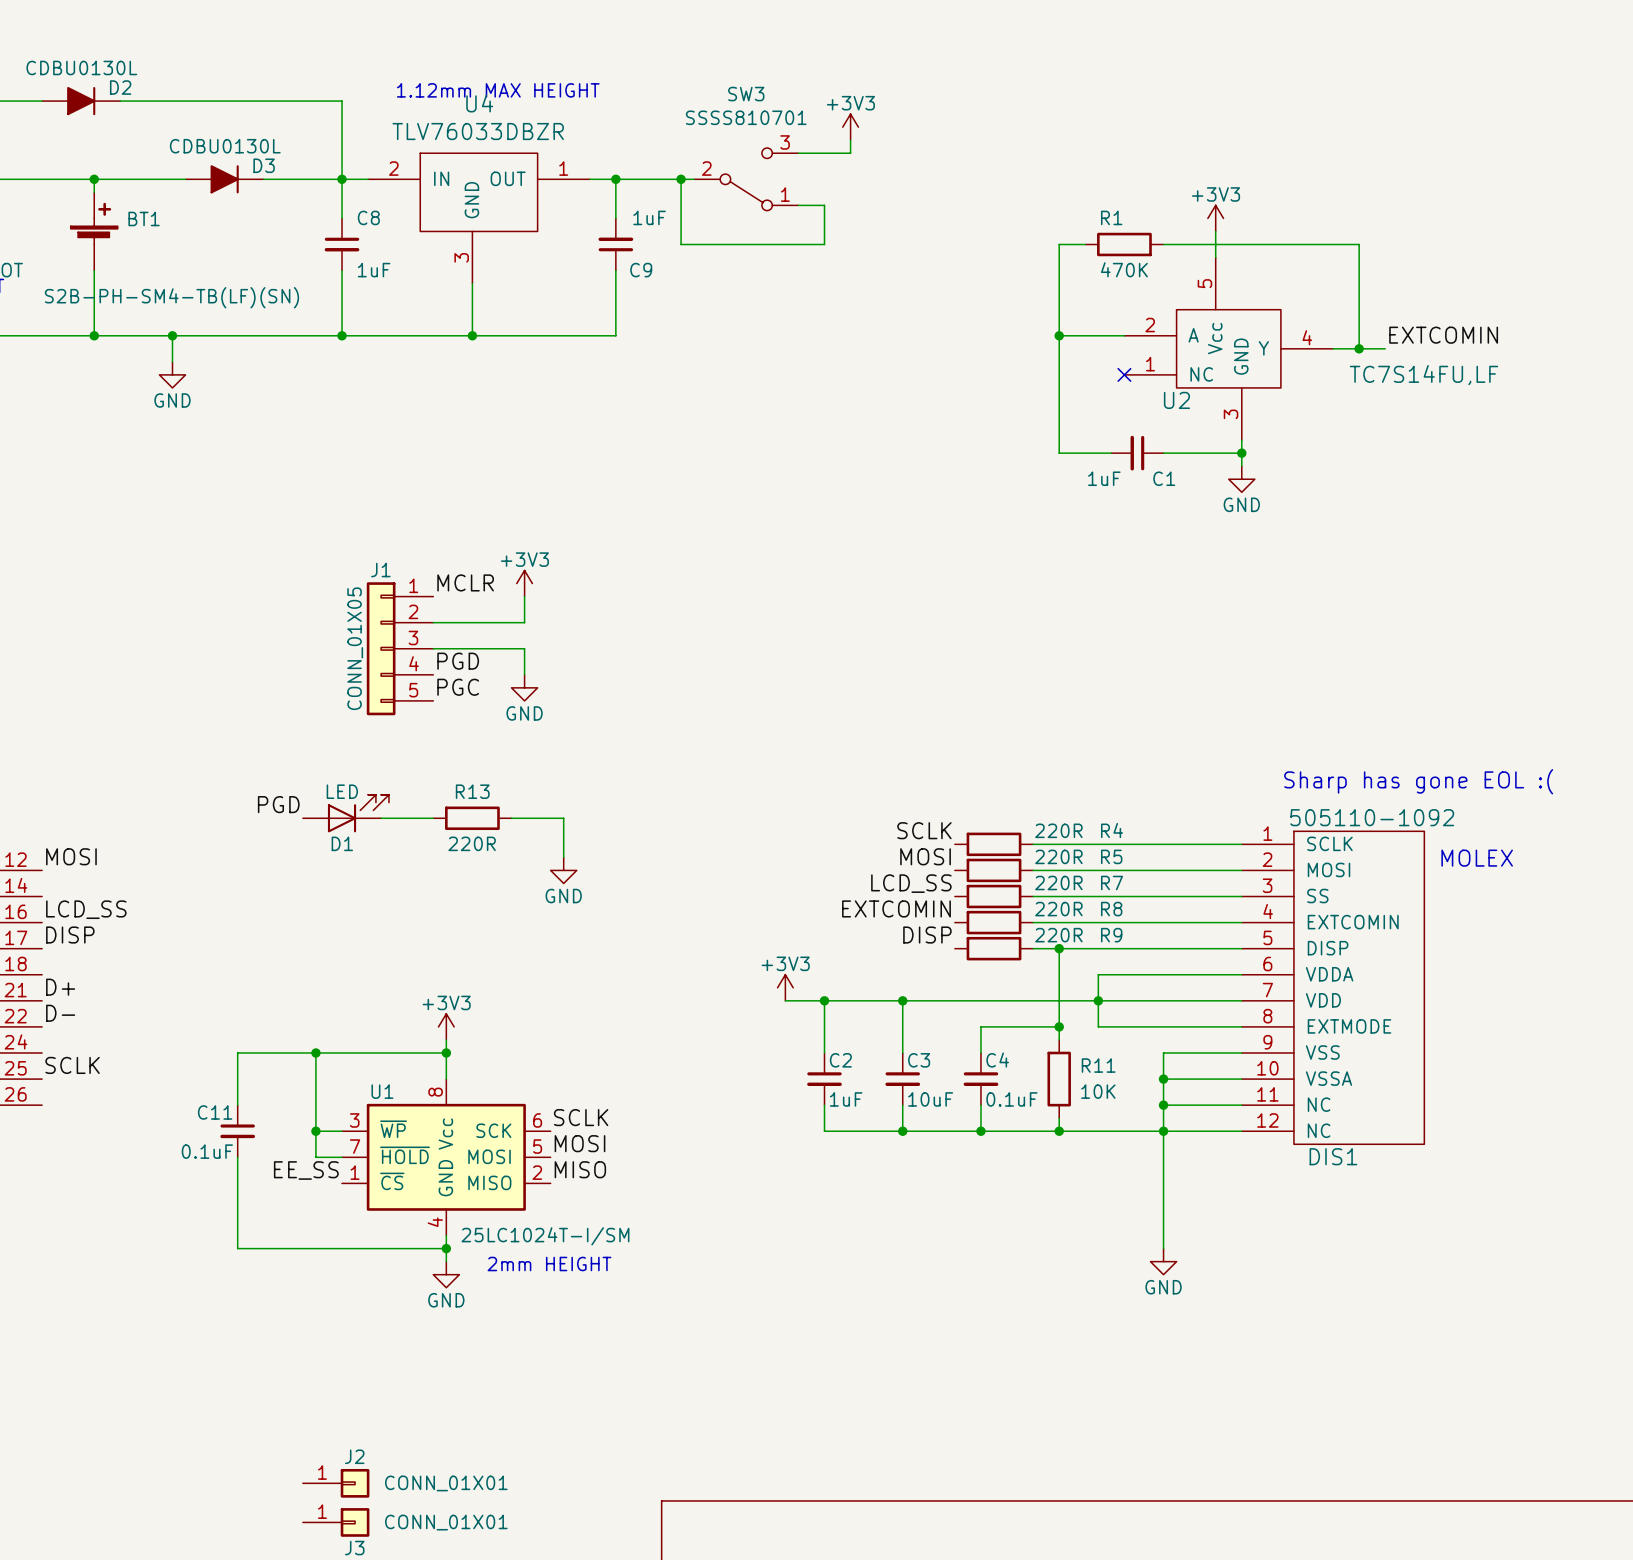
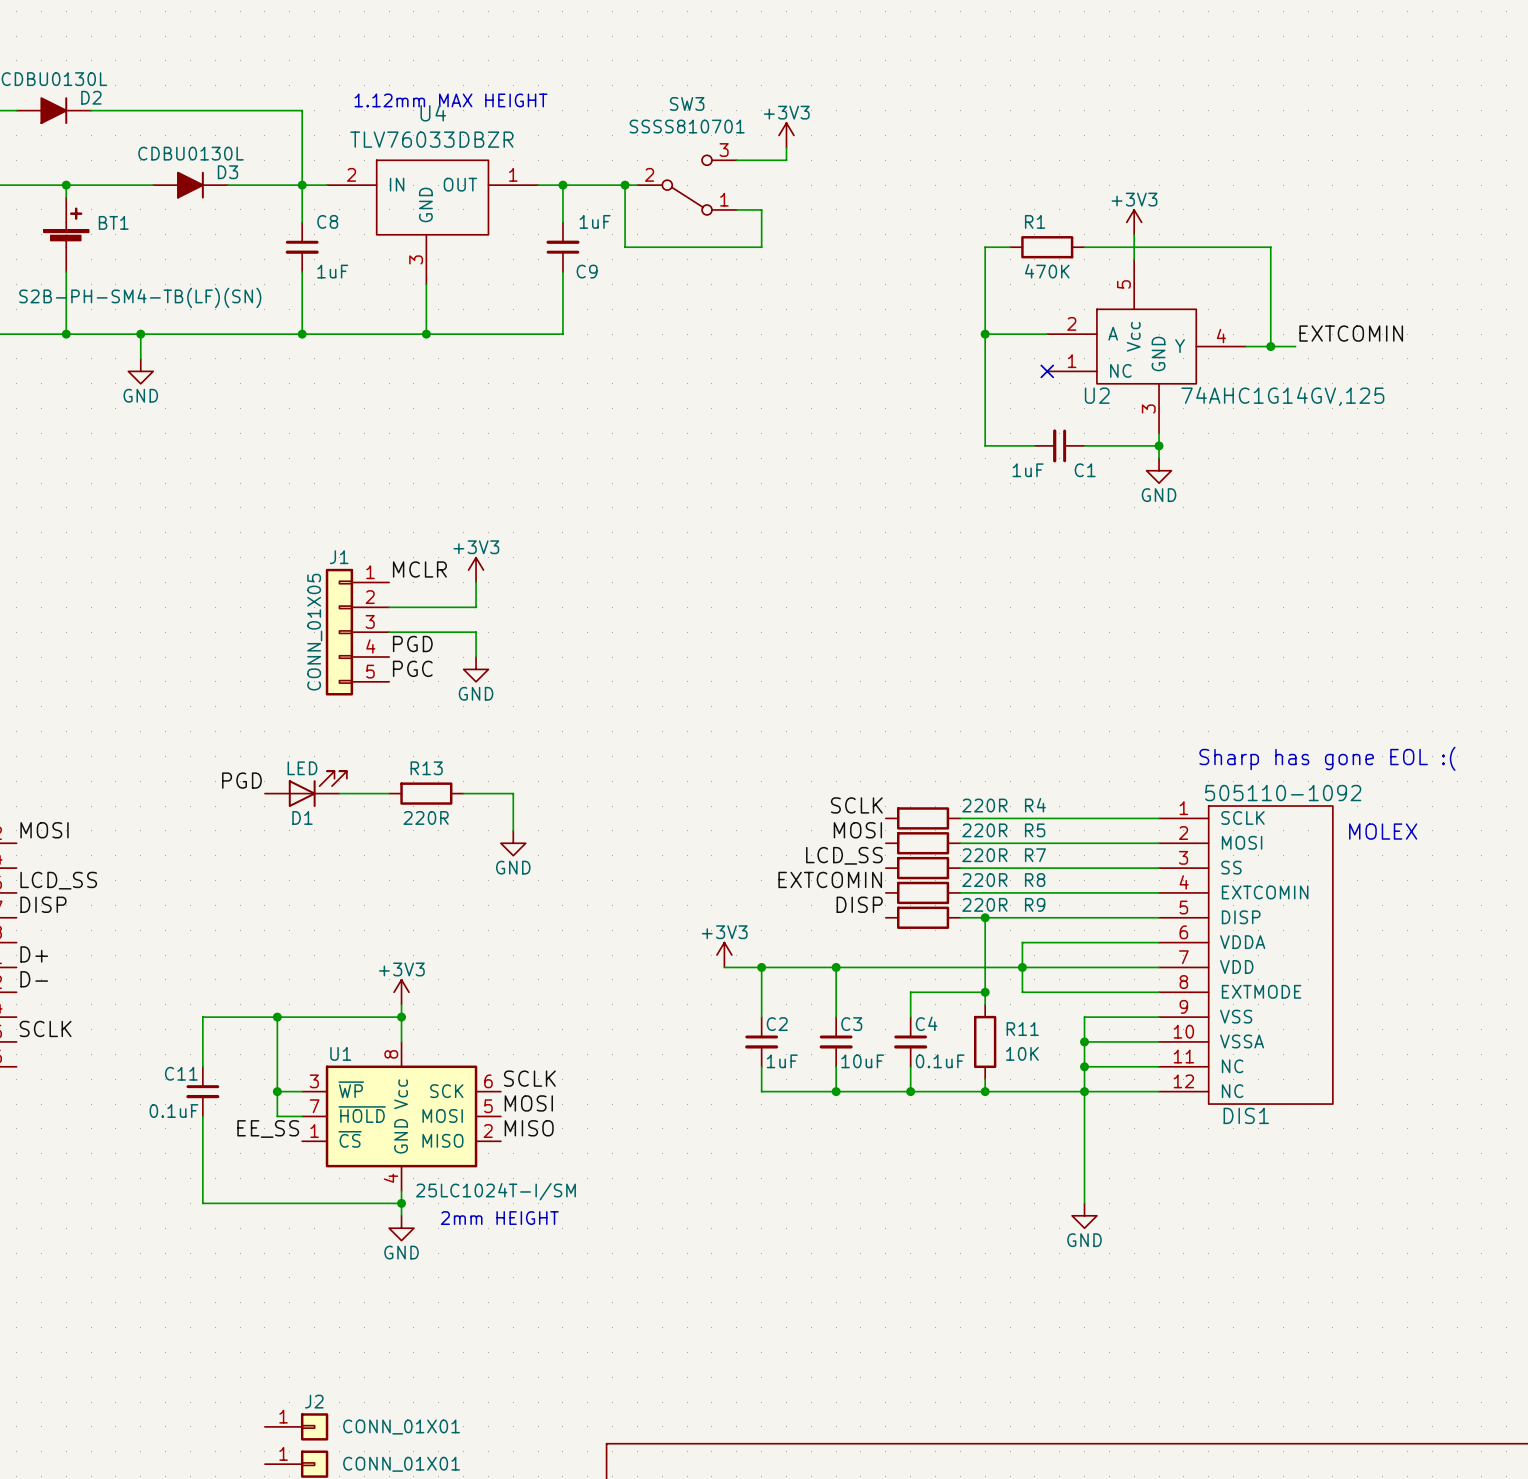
U2 value: TC7S14FU,LF (1423, 375) -> 74AHC1G14GV,125 (1282, 396)

